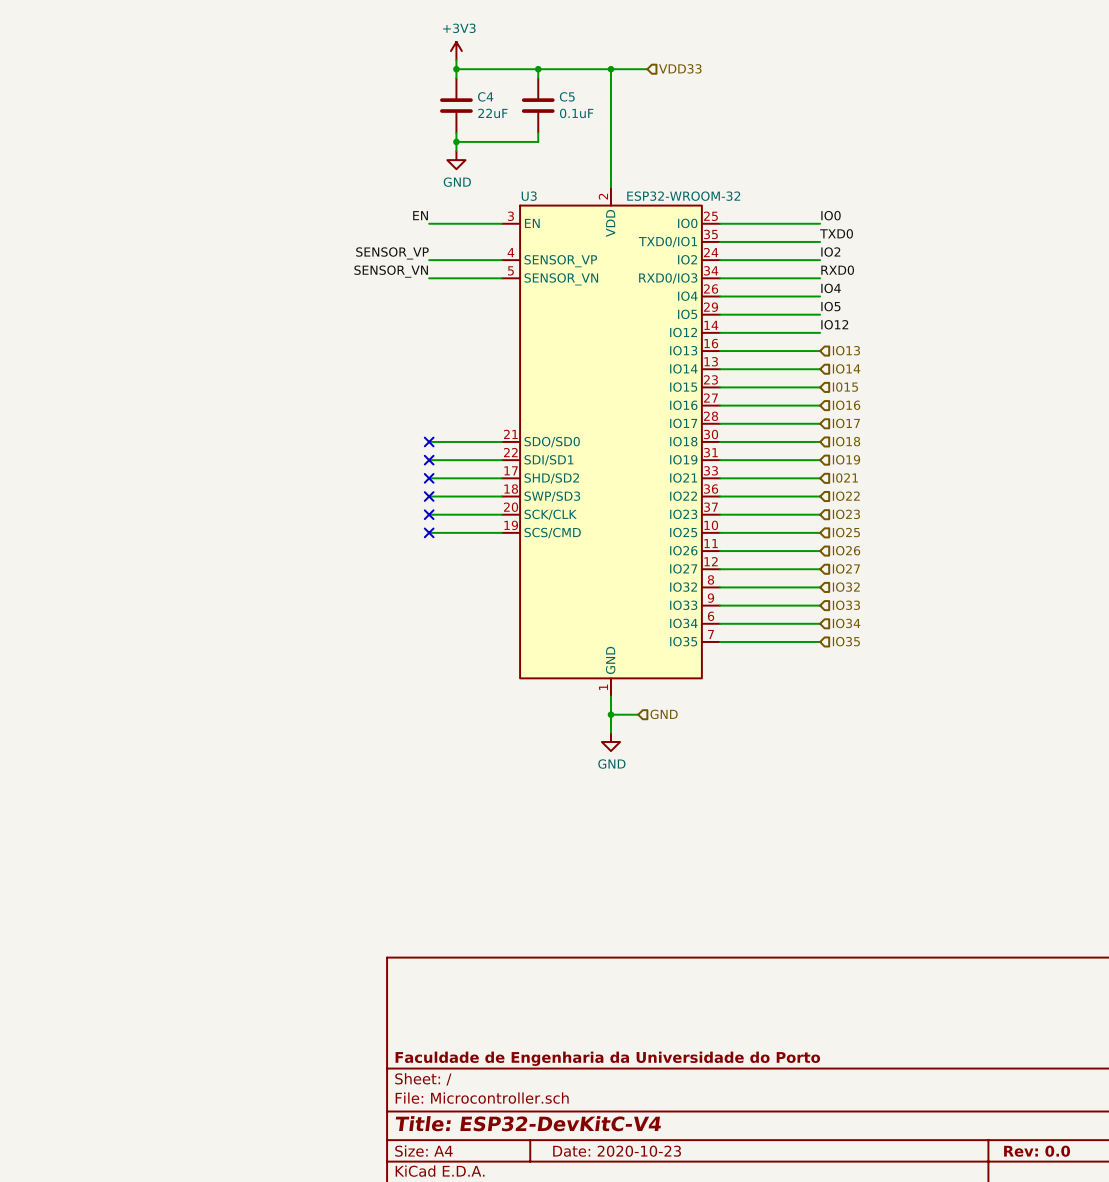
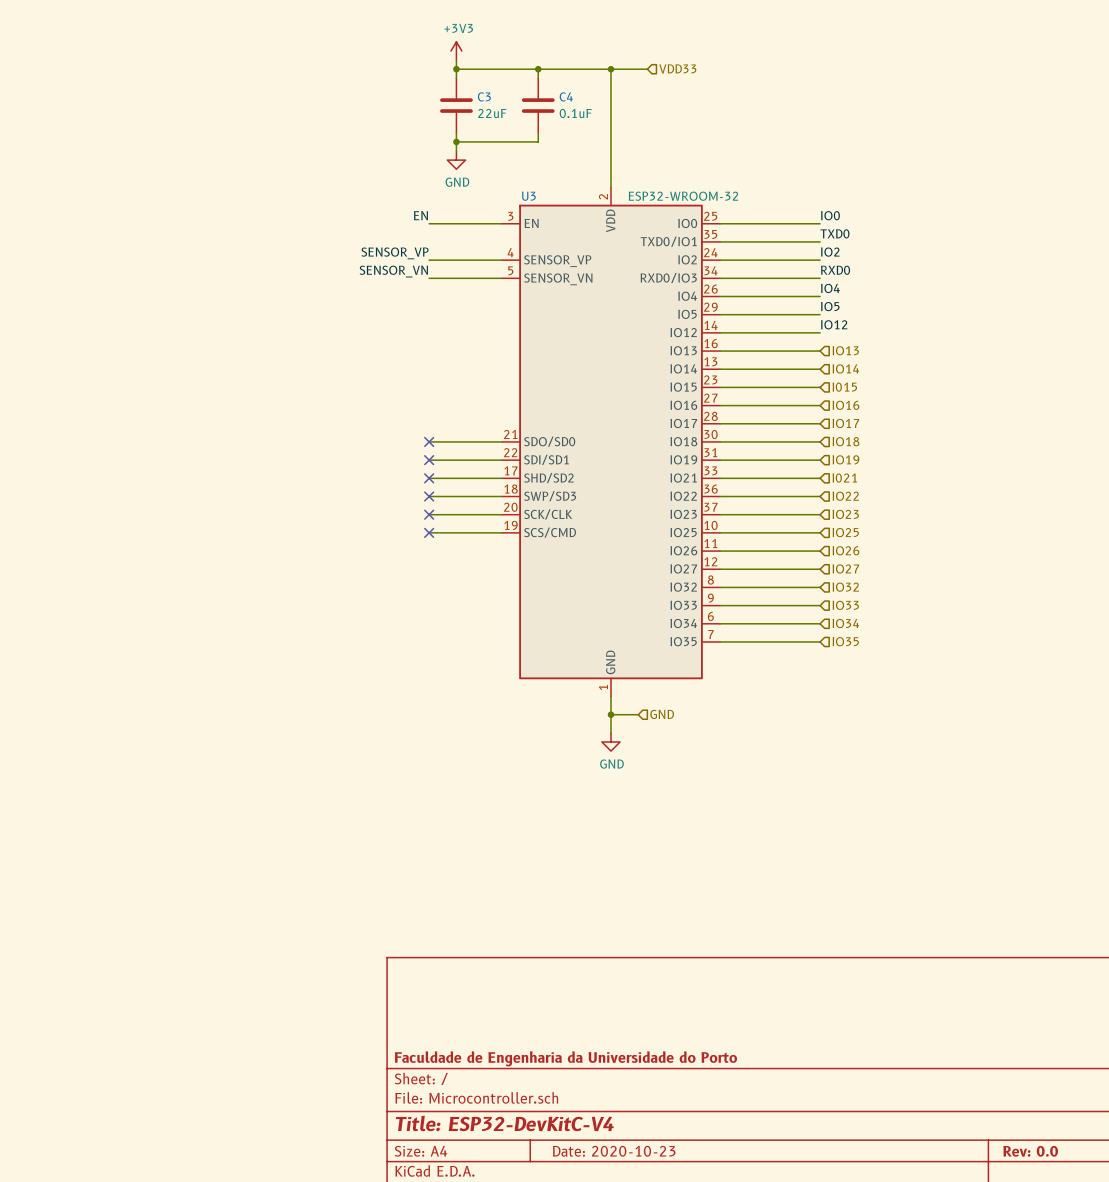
C4 name: C4 (485, 96) -> C3 (484, 96)
C5 name: C5 (567, 96) -> C4 (566, 96)

